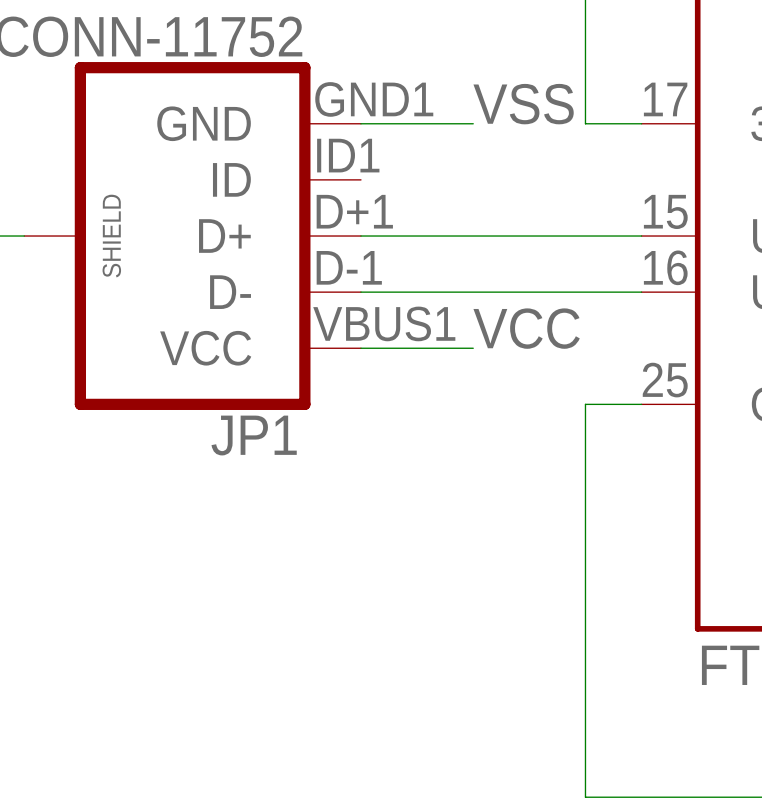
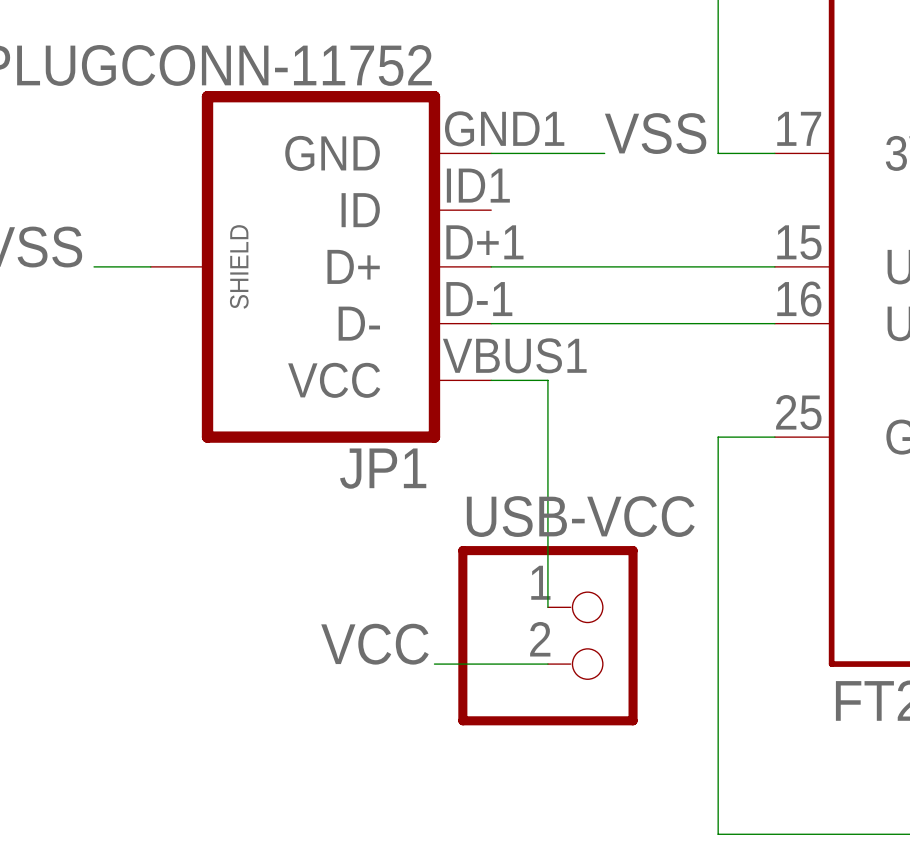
label position: VCC (526, 328) -> VCC (374, 644)
wire: (417, 348) (473, 348) -> (547, 380) (547, 607)
USB-VCC: none -> (547, 635)
wire: none -> (434, 664) (547, 664)

